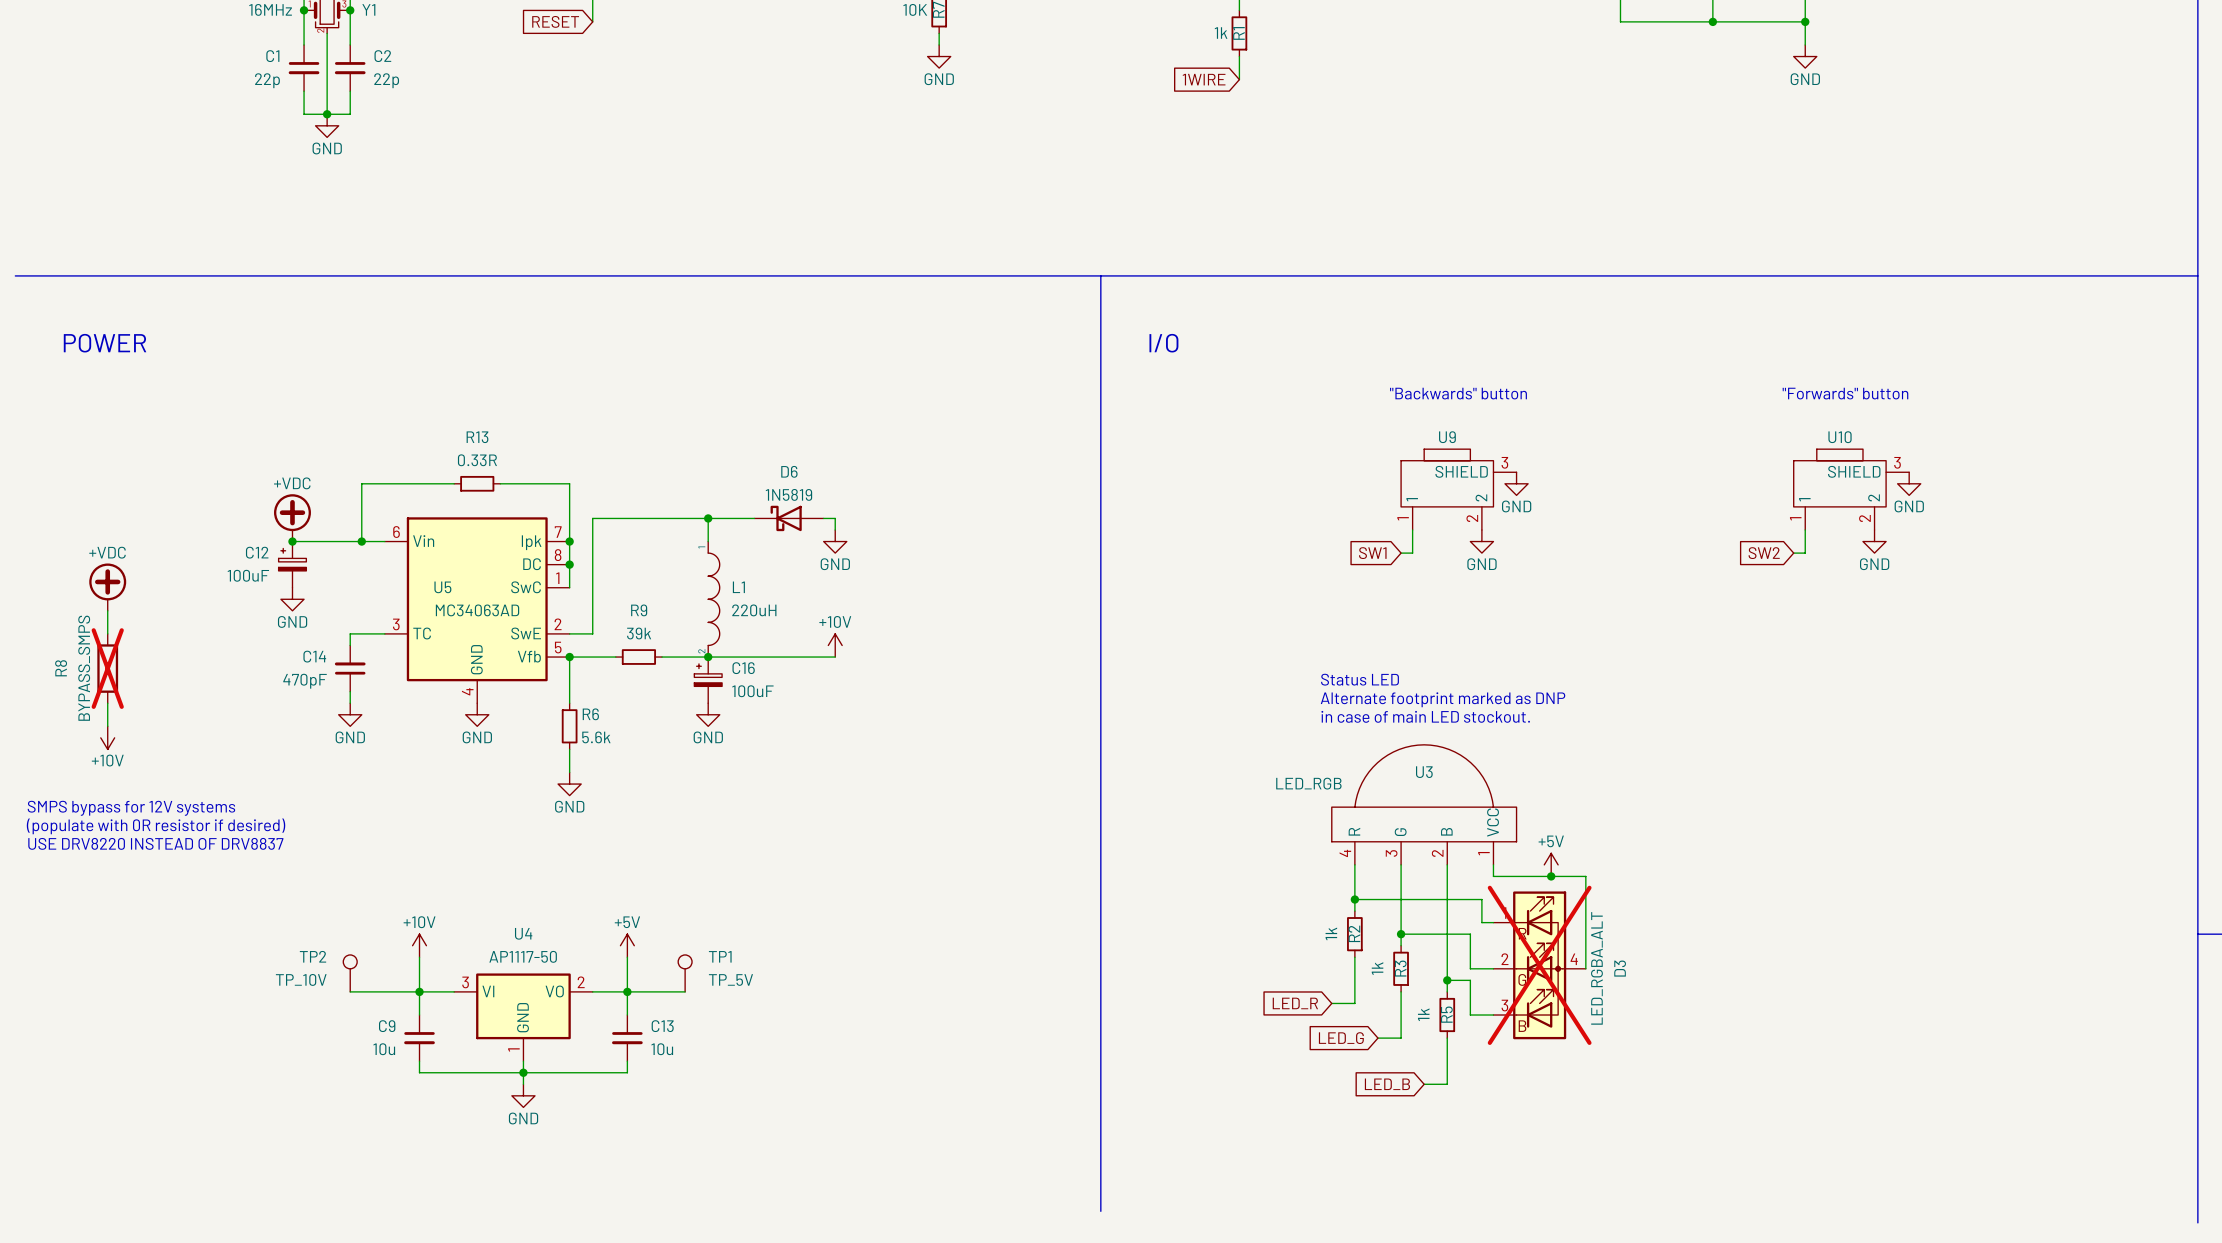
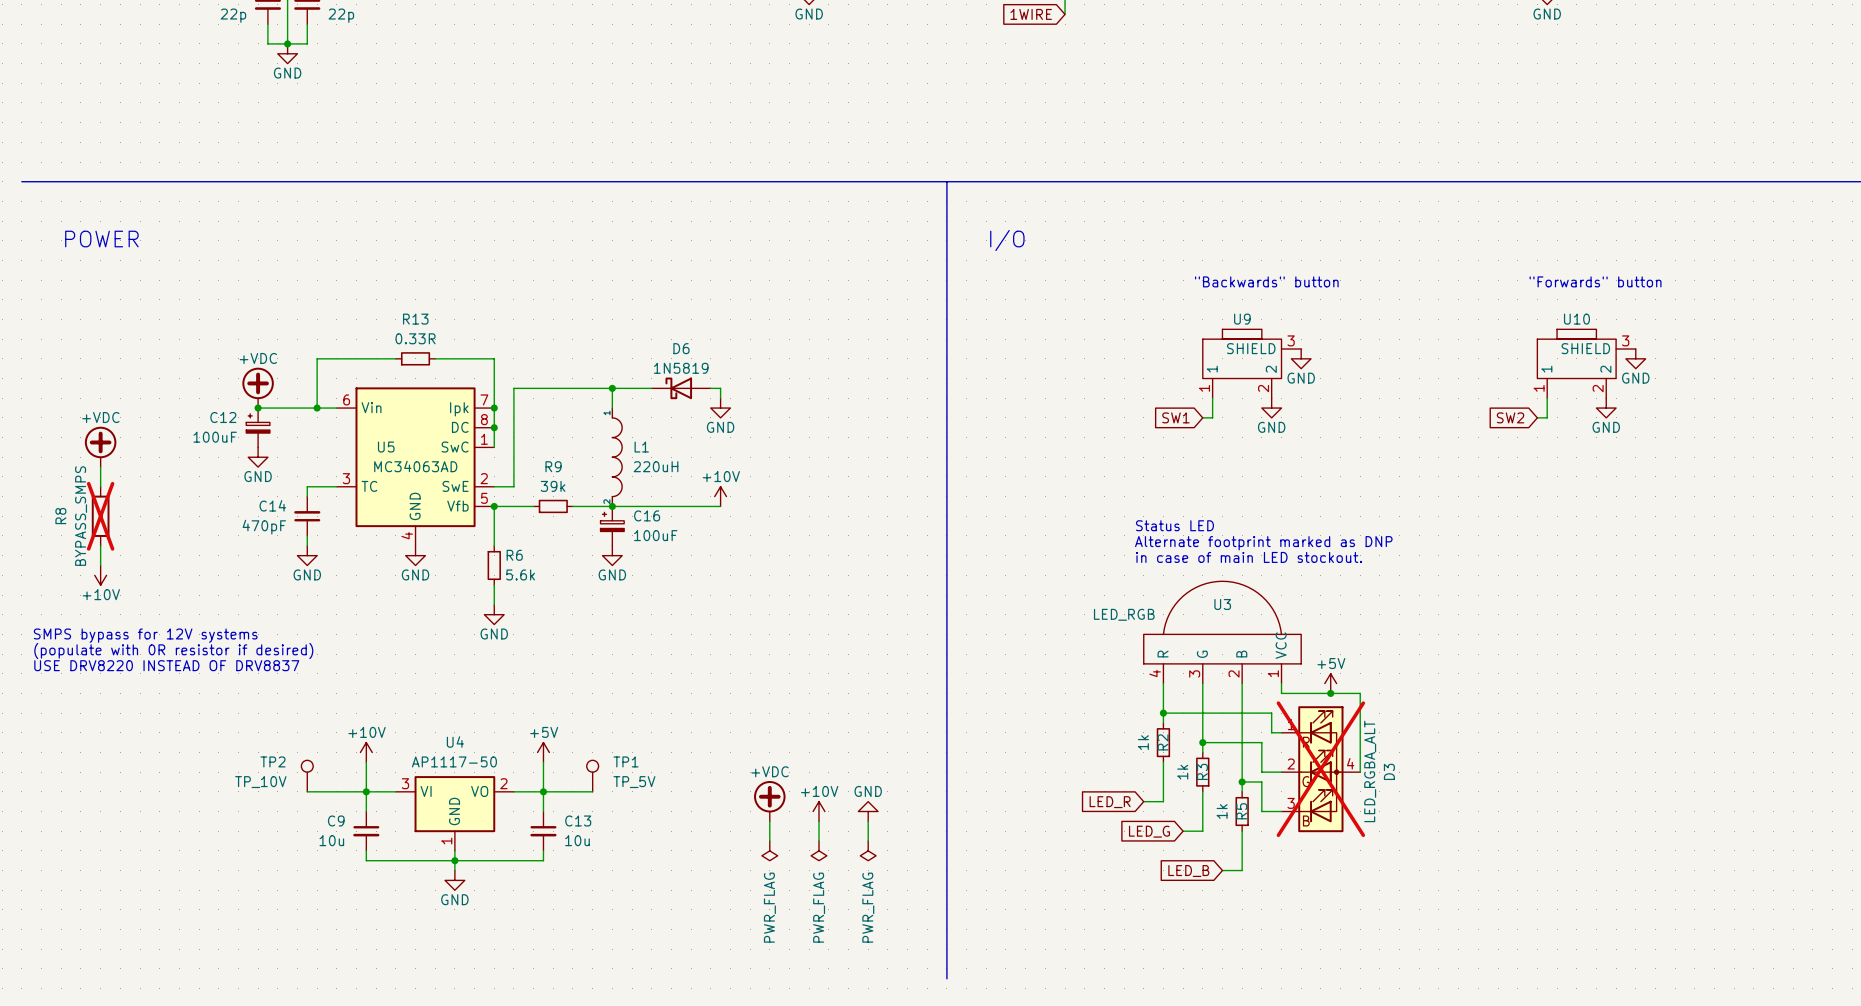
power symbol: none -> +VDC (769, 801)
power symbol: none -> +10V (819, 811)
power symbol: none -> GND (868, 811)
wire: none -> (769, 821) (769, 841)
wire: none -> (819, 821) (819, 841)
wire: none -> (868, 821) (868, 841)
power symbol: none -> PWR_FLAG (769, 850)
power symbol: none -> PWR_FLAG (819, 850)
power symbol: none -> PWR_FLAG (868, 850)

